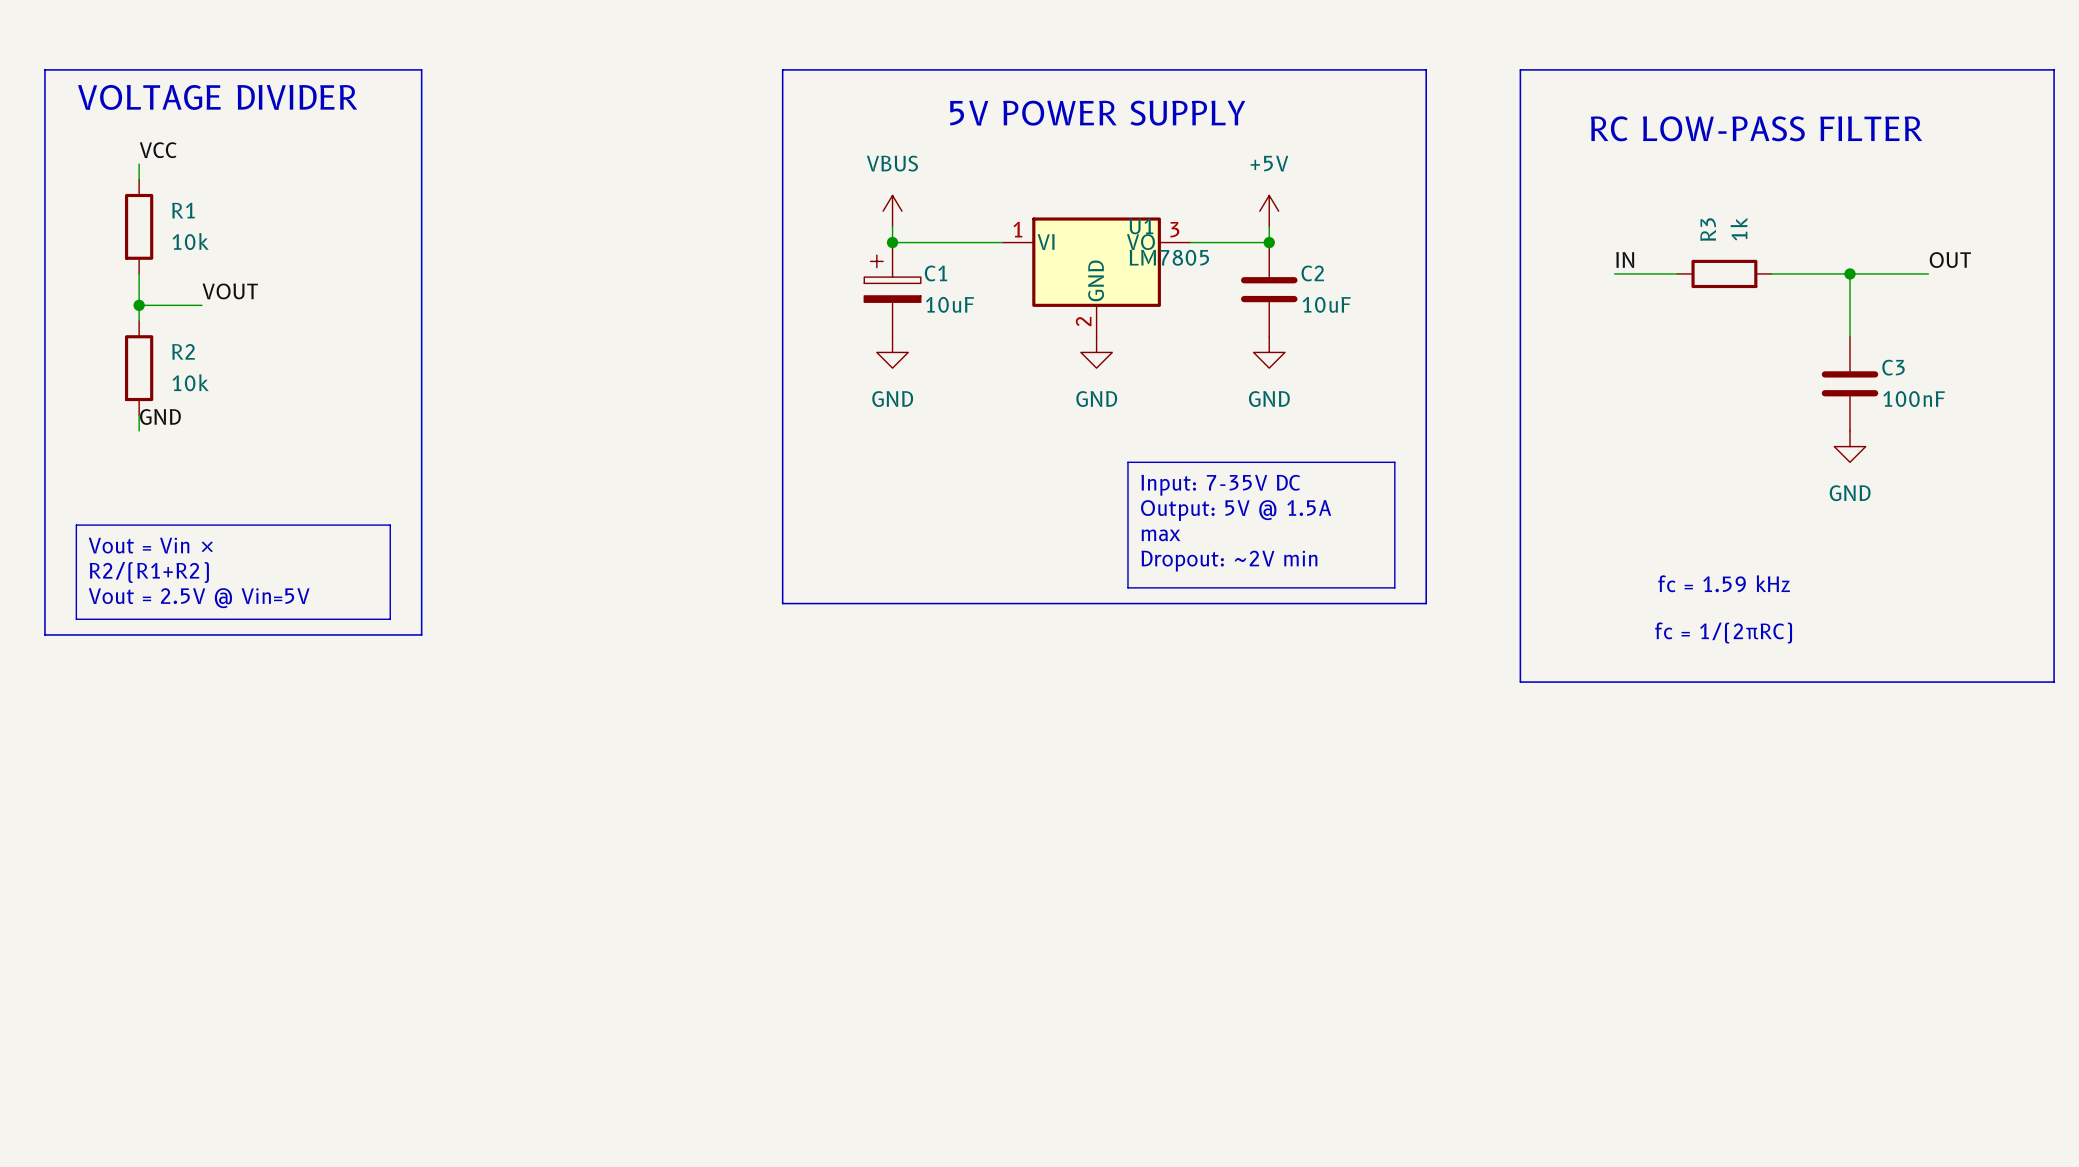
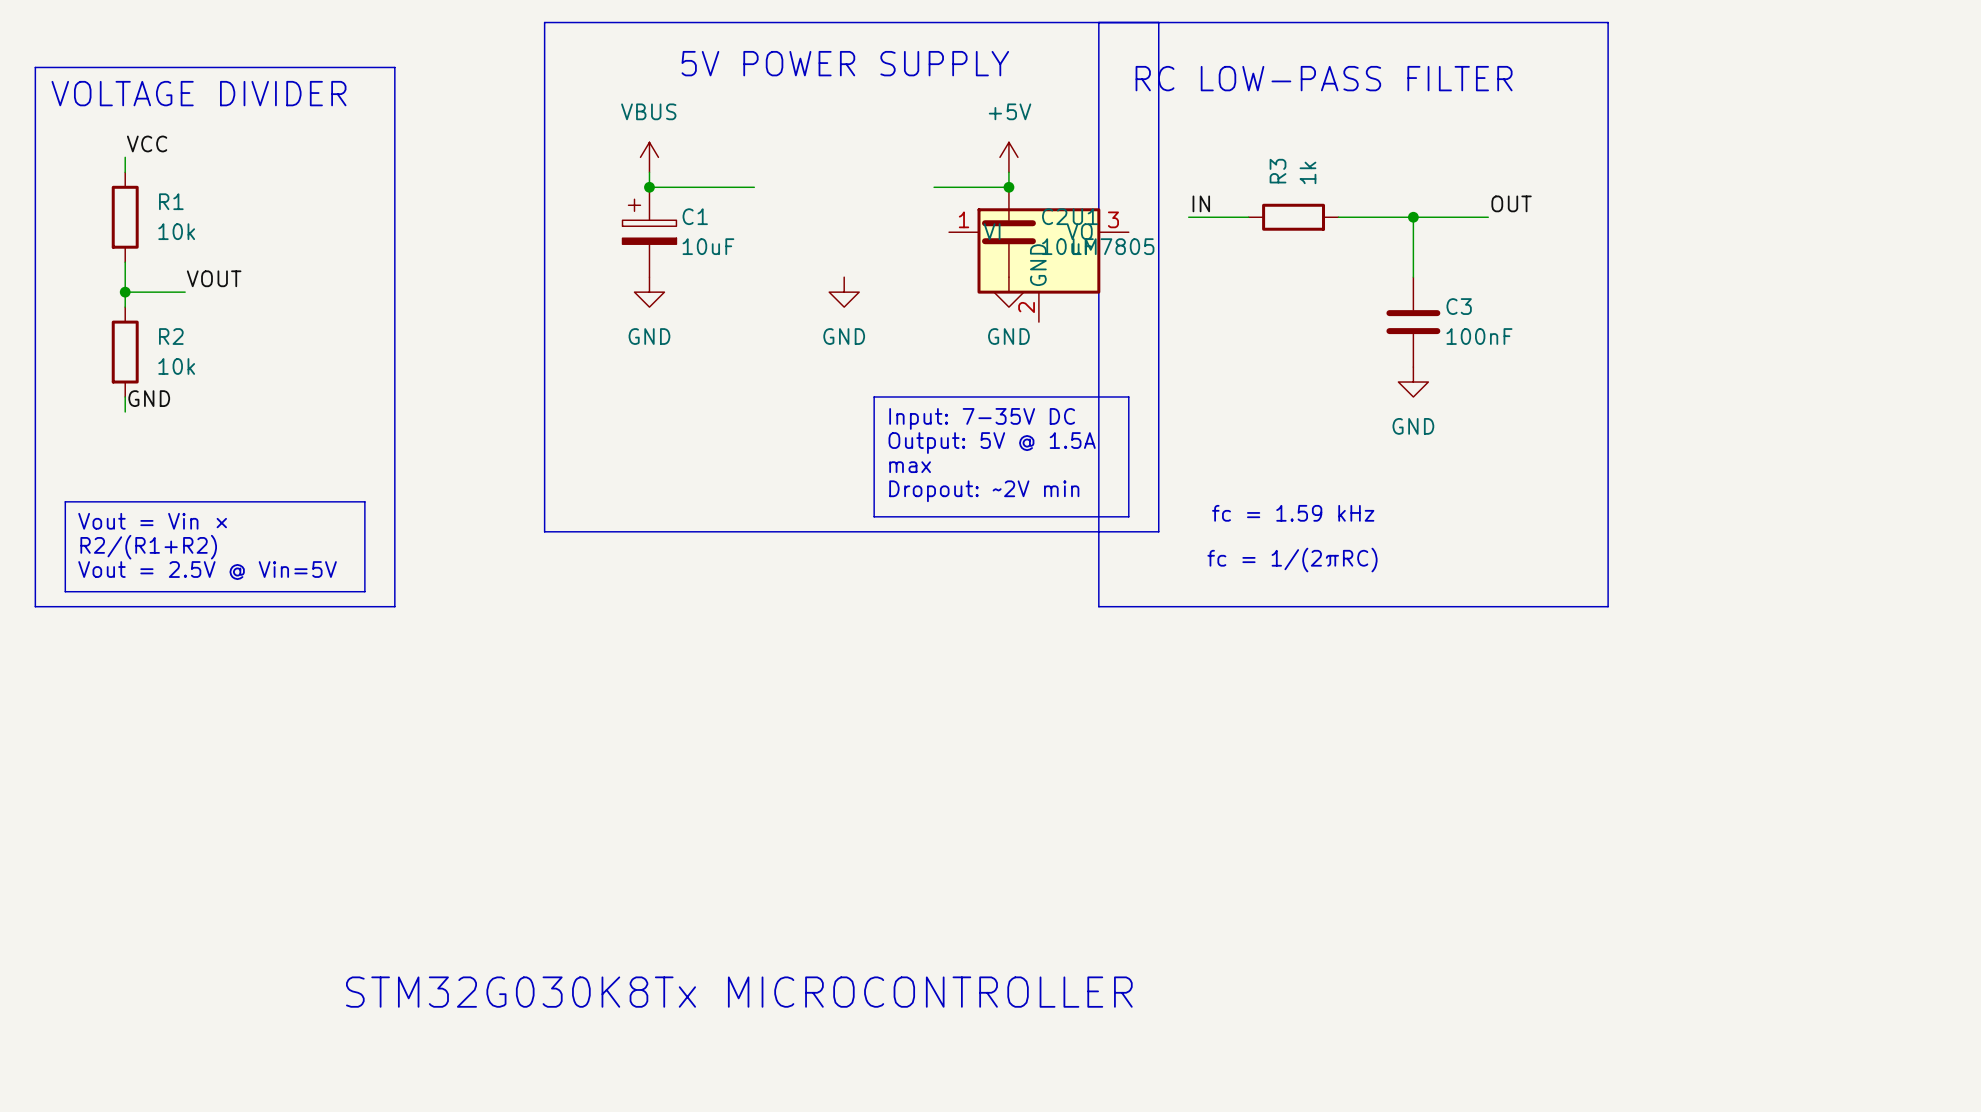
line: none -> (1098, 22) (1098, 606) (1608, 606) (1608, 22) (544, 22) (544, 531) (1158, 531) (1158, 22)
line: (782, 69) (1426, 69) (1426, 603) (782, 603) (782, 69) -> none
line: (1520, 69) (2054, 69) (2054, 682) (1520, 682) (1520, 69) -> none
text: none -> RC LOW-PASS FILTER (1324, 78)
text position: 5V POWER SUPPLY (1097, 113) -> 5V POWER SUPPLY (845, 63)
text: RC LOW-PASS FILTER (1756, 128) -> none
junction: none -> (649, 187)
junction: none -> (1008, 187)
power symbol position: VBUS (892, 211) -> VBUS (649, 157)
power symbol position: +5V (1269, 211) -> +5V (1008, 157)
label: none -> IN (1201, 203)
label: none -> OUT (1511, 203)
wire: (892, 226) (892, 242) (1002, 242) -> (649, 172) (649, 187) (754, 187)
wire: none -> (1188, 217) (1248, 217)
wire: (1269, 226) (1269, 242) (1190, 242) -> (1008, 172) (1008, 187) (934, 187)
wire: none -> (1338, 217) (1488, 217)
wire: none -> (1413, 217) (1413, 277)
junction: none -> (1413, 217)
junction: (892, 242) -> none
junction: (1269, 242) -> none
label: IN (1625, 259) -> none
label: OUT (1950, 260) -> none
wire: (1614, 273) (1677, 273) -> none
R3 position: (1724, 273) -> (1293, 217)
wire: (1771, 273) (1928, 273) -> none
wire: (1850, 273) (1850, 336) -> none
junction: (1850, 273) -> none
C1 position: (892, 289) -> (649, 232)
C2 position: (1269, 289) -> (1008, 232)
power symbol: none -> GND (649, 292)
power symbol position: GND (892, 352) -> GND (844, 292)
power symbol position: GND (1096, 352) -> GND (1008, 292)
power symbol: GND (1269, 352) -> none
C3 position: (1850, 383) -> (1413, 322)
power symbol: none -> GND (1413, 382)
power symbol: GND (1850, 446) -> none
line: (1127, 462) (1394, 462) (1394, 587) (1127, 587) (1127, 462) -> (874, 396) (1128, 396) (1128, 516) (874, 516) (874, 396)
text position: Input: 7-35V DC (1220, 485) -> Input: 7-35V DC (982, 418)
text position: Output: 5V @ 1.5A (1236, 510) -> Output: 5V @ 1.5A (992, 443)
text position: max (1161, 535) -> max (910, 467)
text: none -> fc = 1.59 kHz (1293, 513)
text position: Dropout: ~2V min (1229, 561) -> Dropout: ~2V min (984, 491)
text: fc = 1.59 kHz (1724, 583) -> none
text: none -> fc = 1/(2πRC) (1292, 560)
text: fc = 1/(2πRC) (1723, 632) -> none
text: none -> STM32G030K8Tx MICROCONTROLLER (739, 992)

